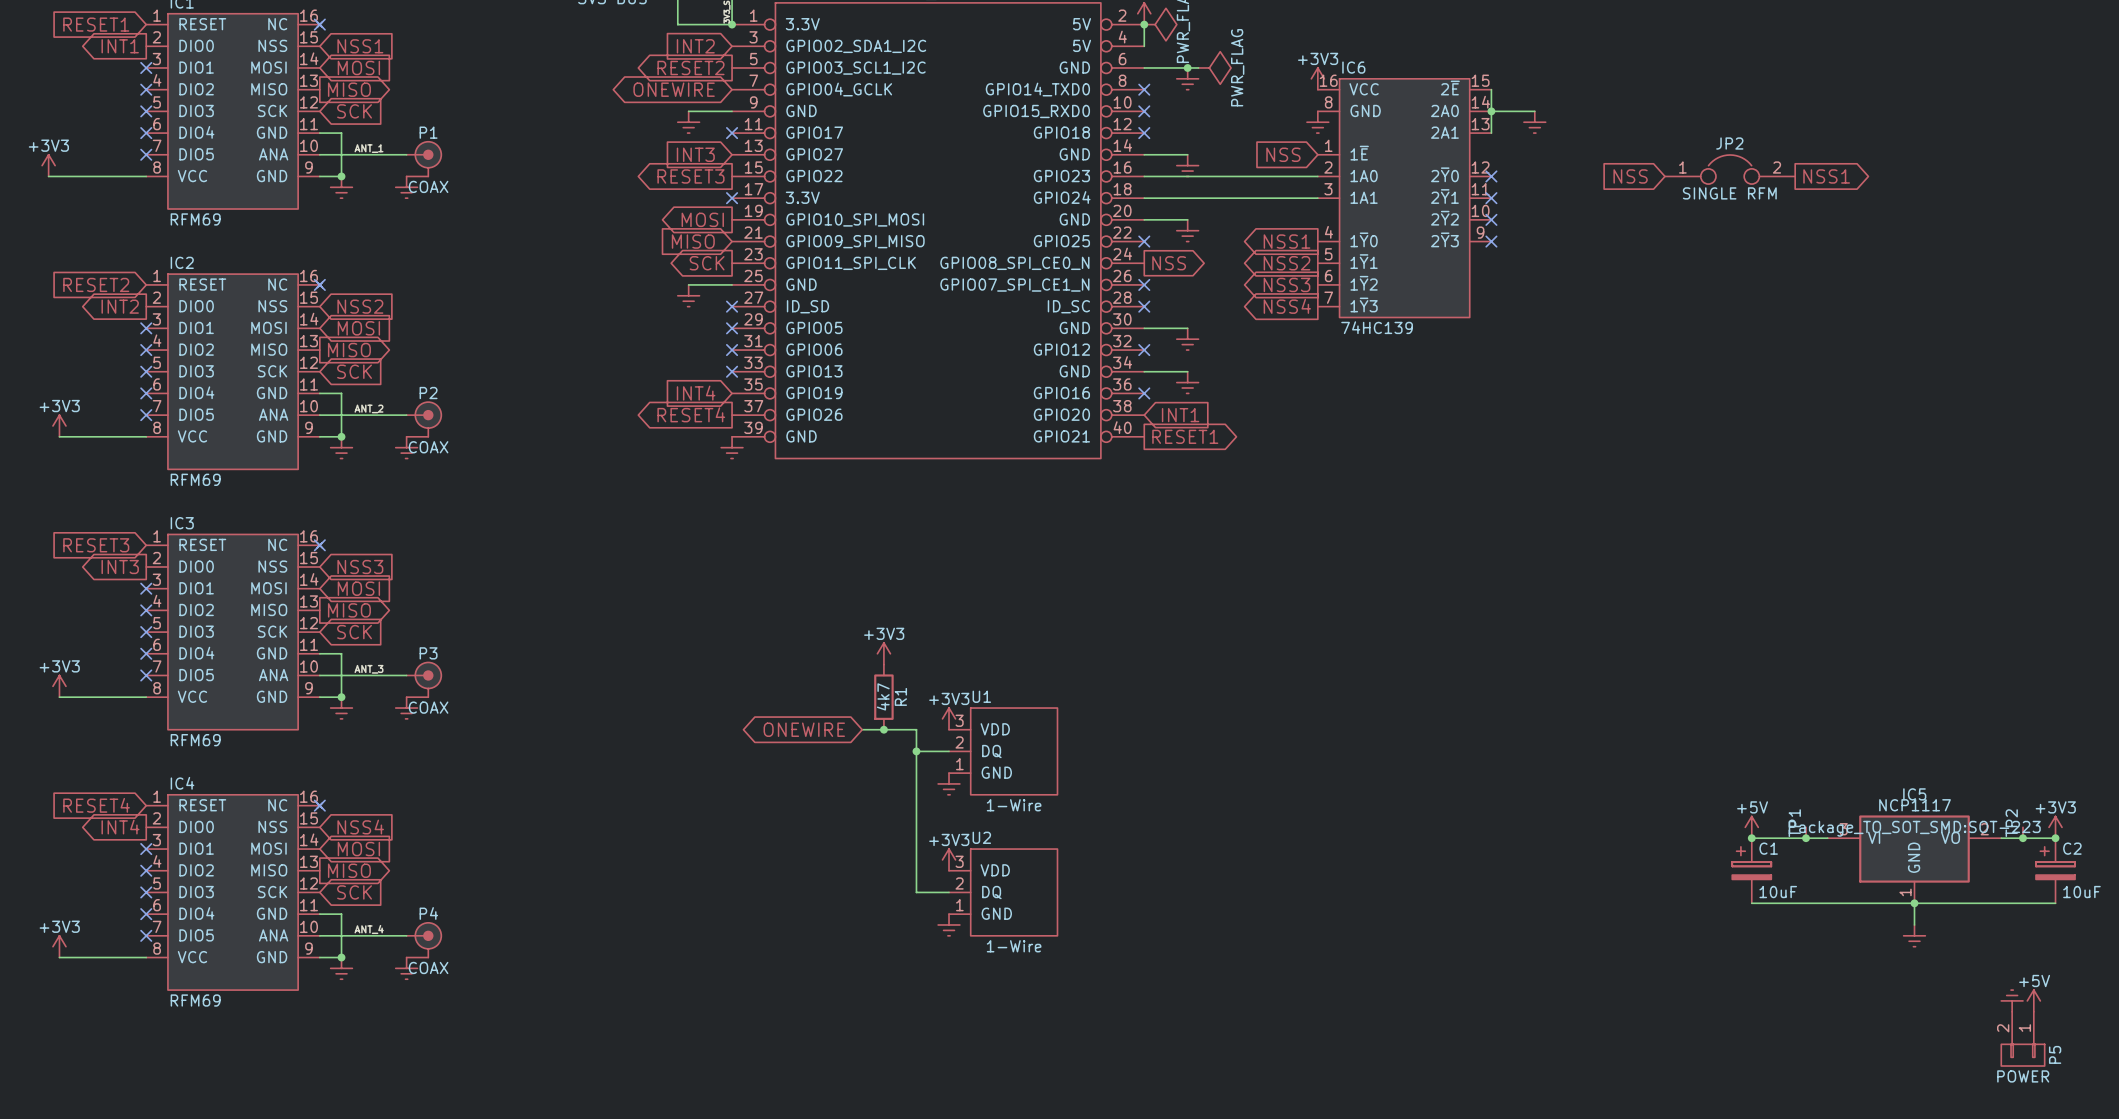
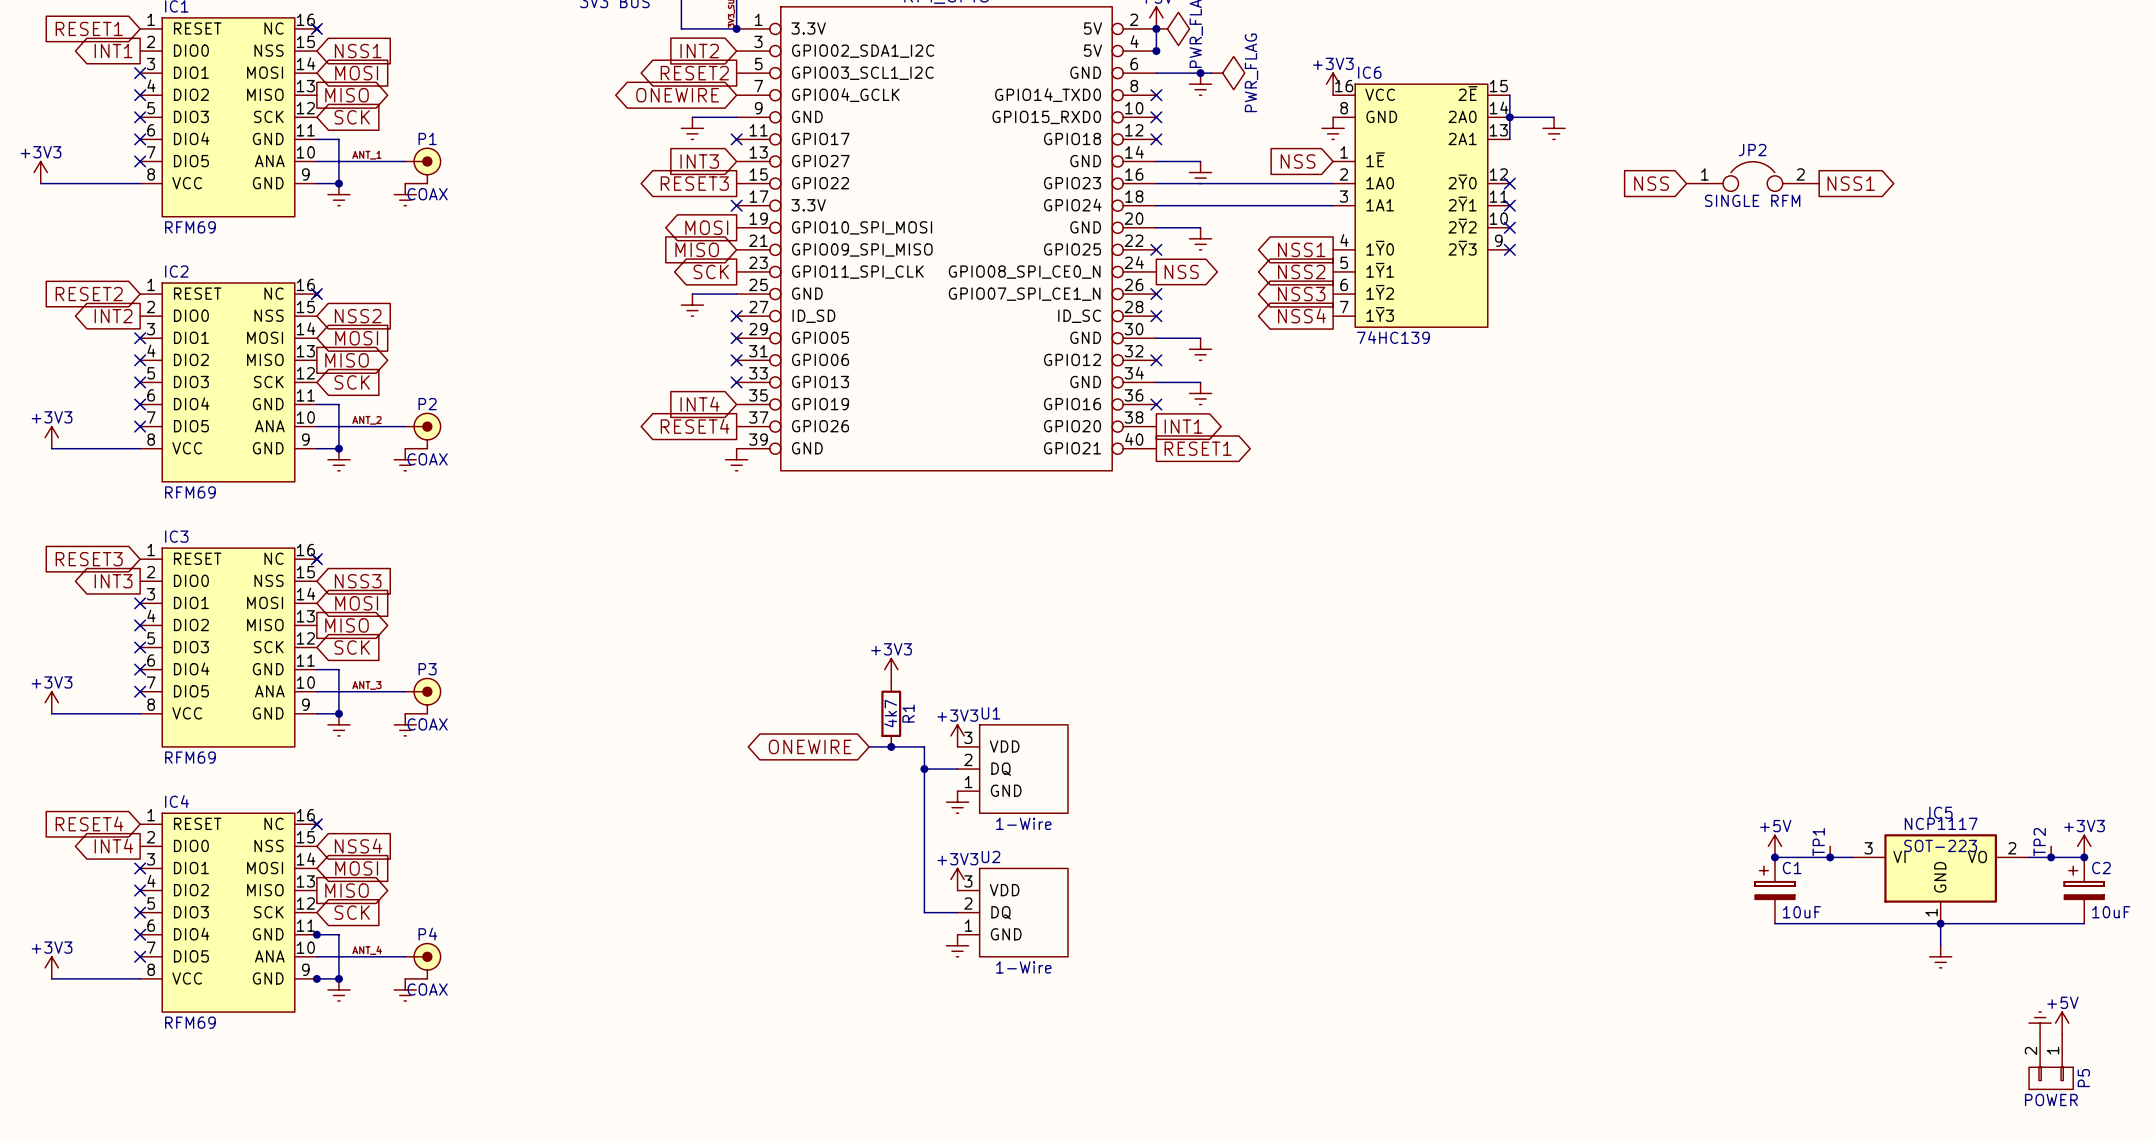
junction: none -> (1156, 51)
global label shape: input (1180, 415) -> output (1183, 426)
IC5 text: Package_TO_SOT_SMD:SOT-223 (1914, 828) -> SOT-223 (1940, 845)
junction: none -> (316, 934)
junction: none -> (316, 978)

